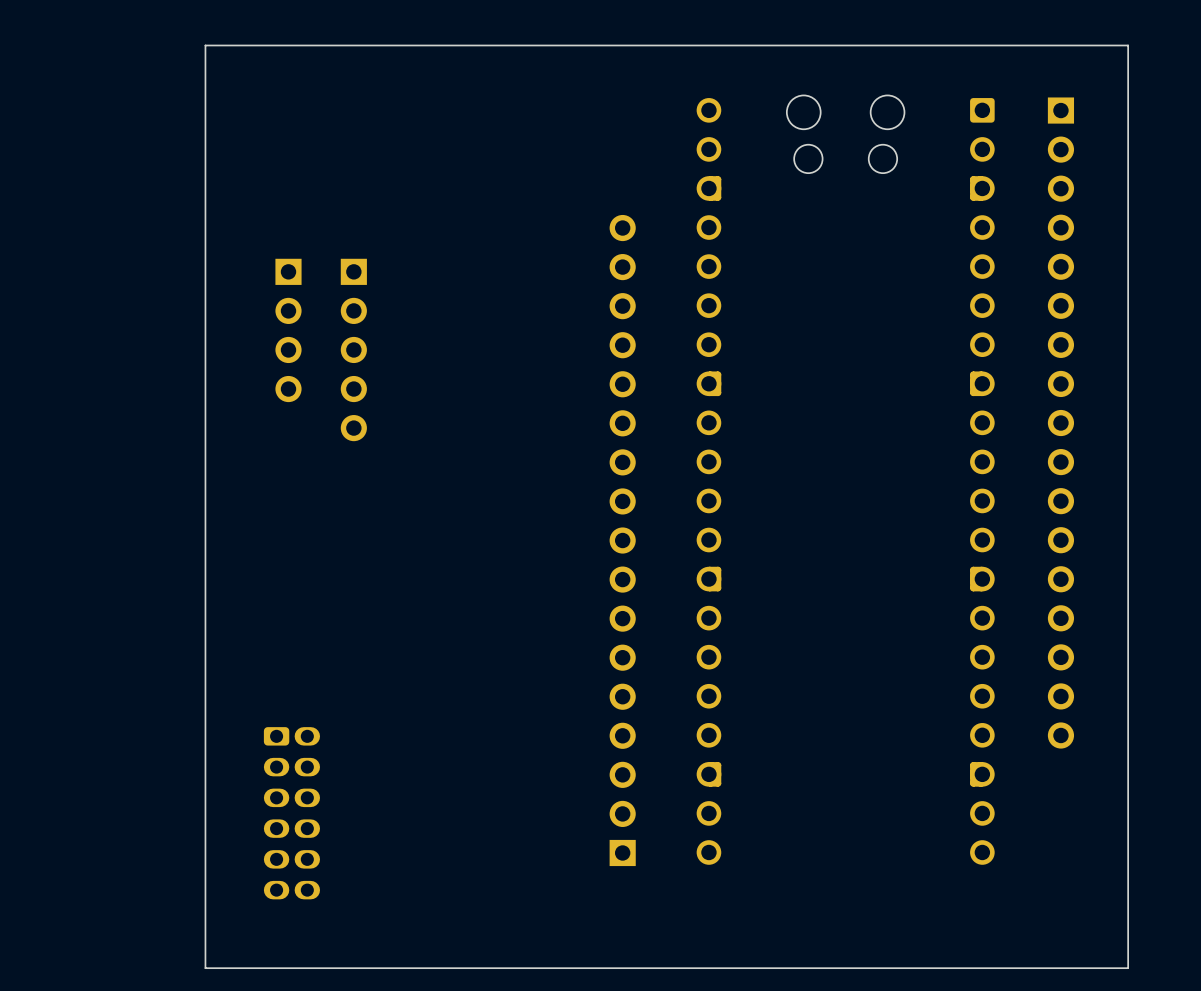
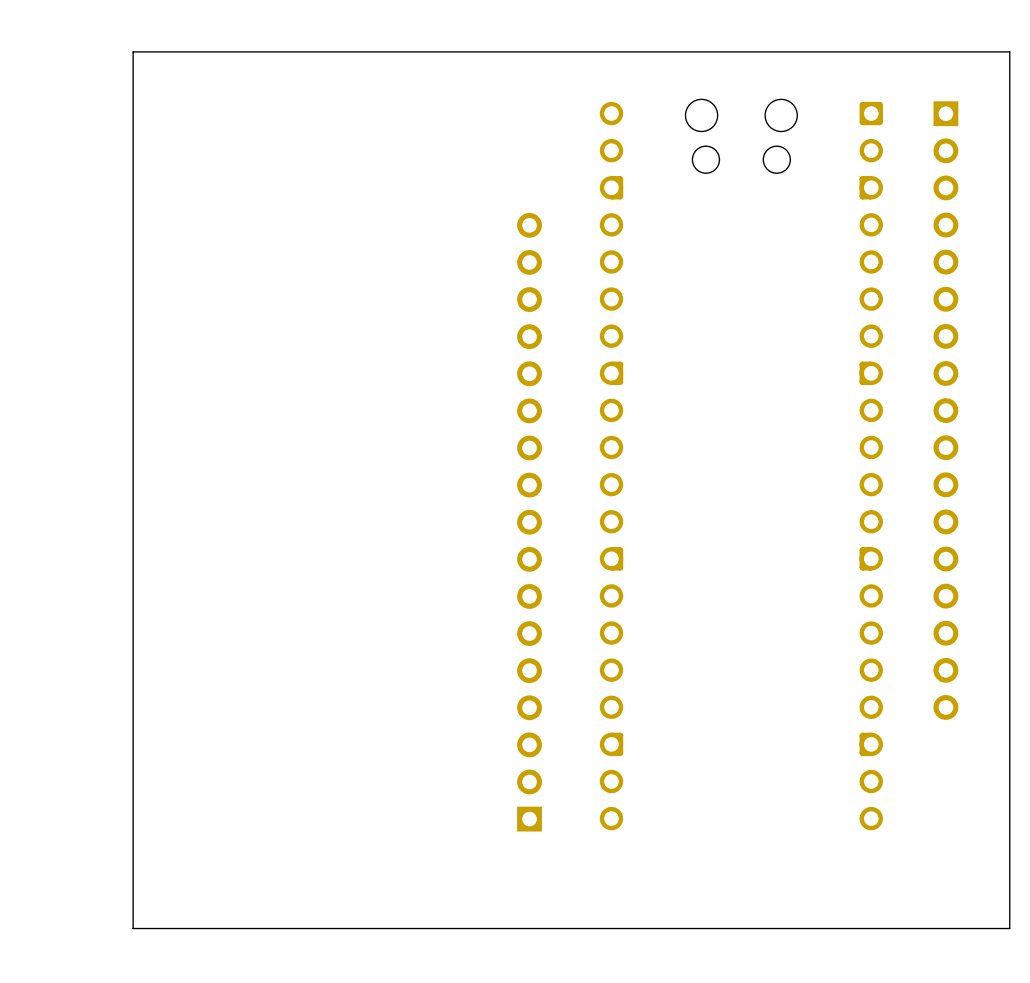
part: (288, 330) -> none
part: (353, 349) -> none
part: (291, 813) -> none

